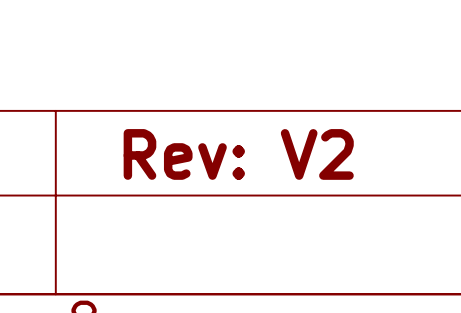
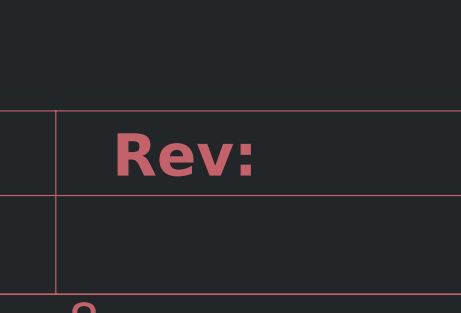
title block: Rev: V2 (238, 154) -> Rev: (184, 154)

